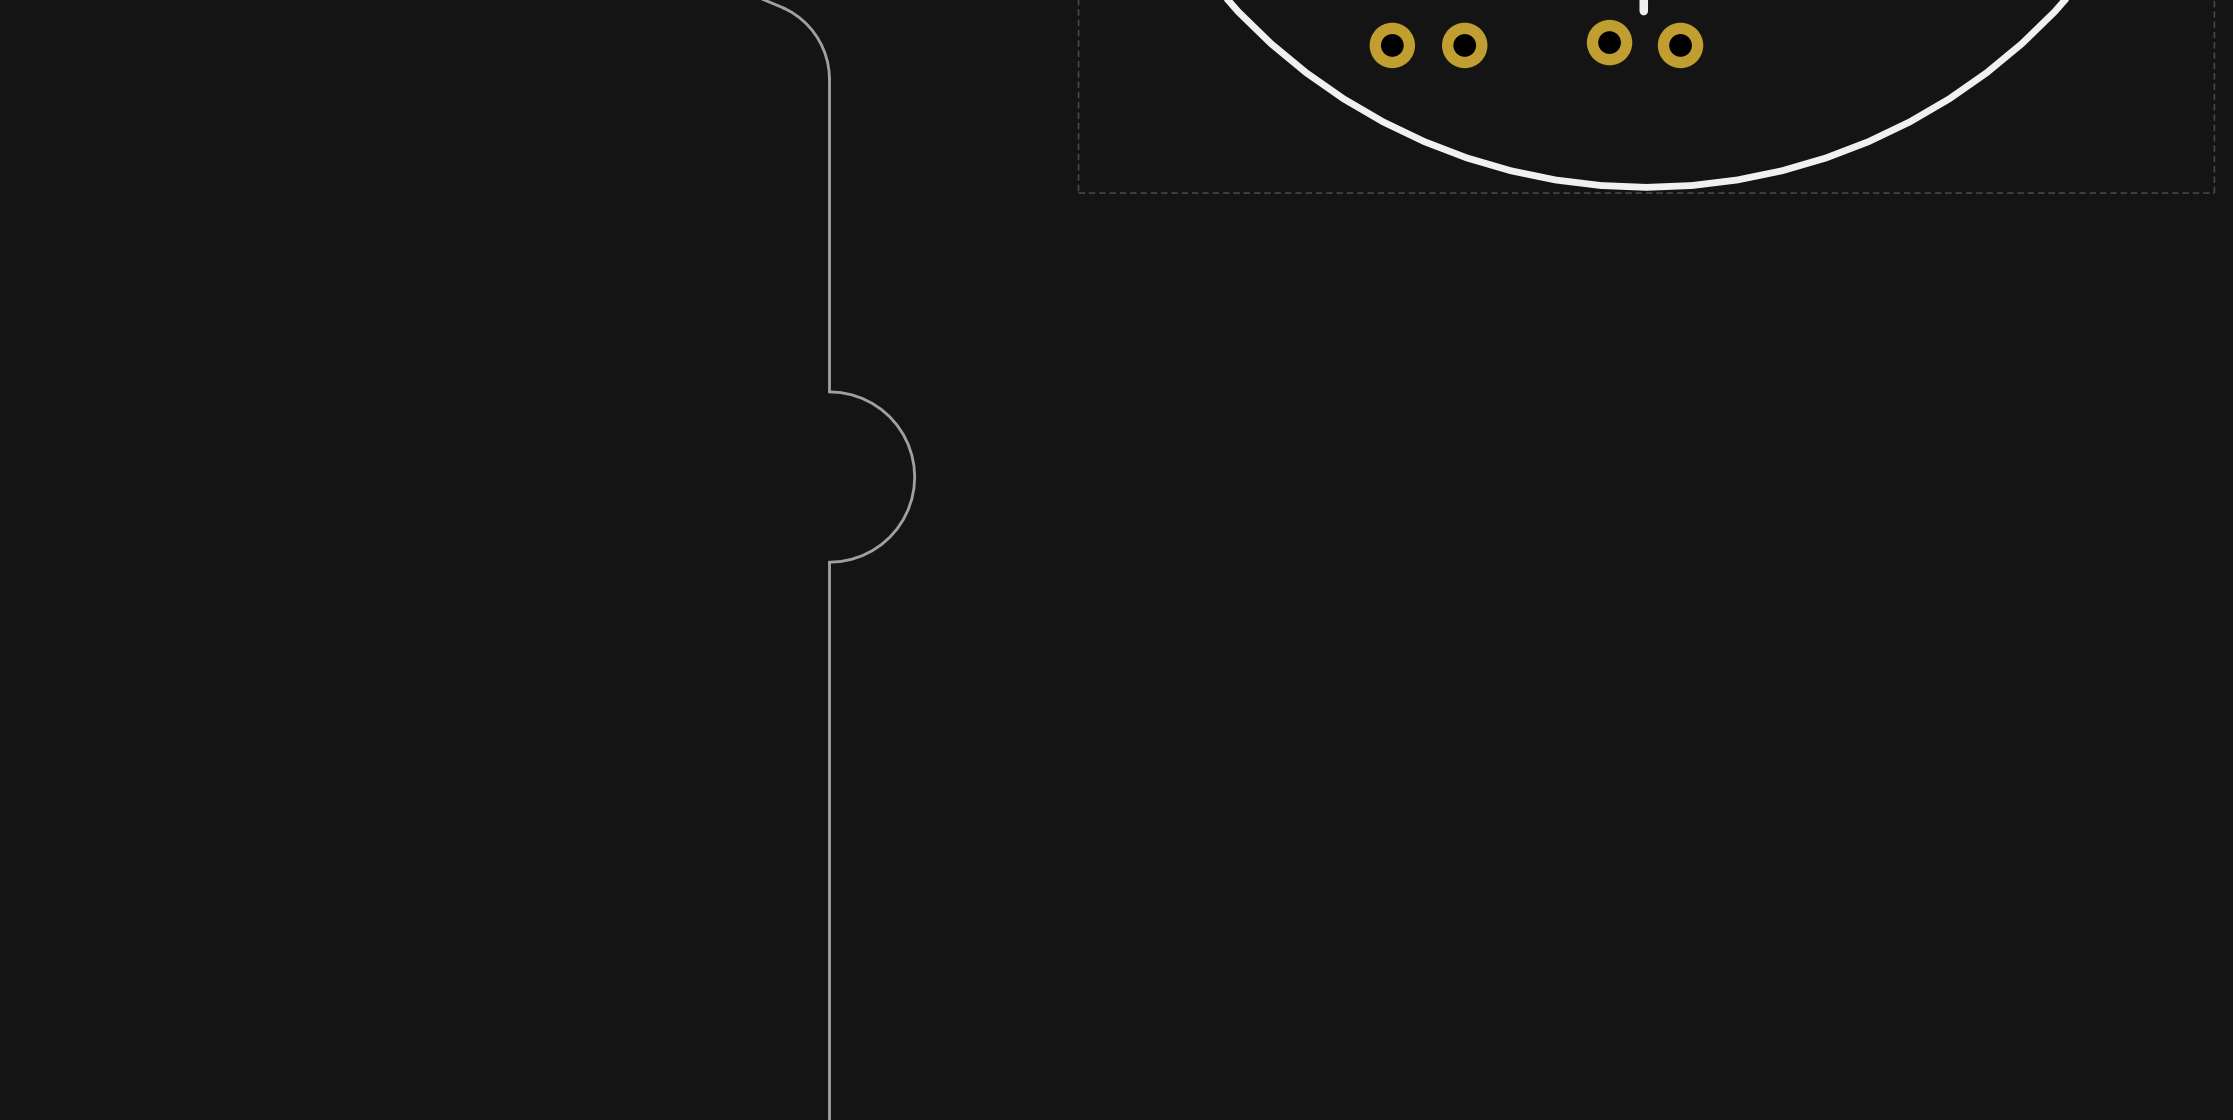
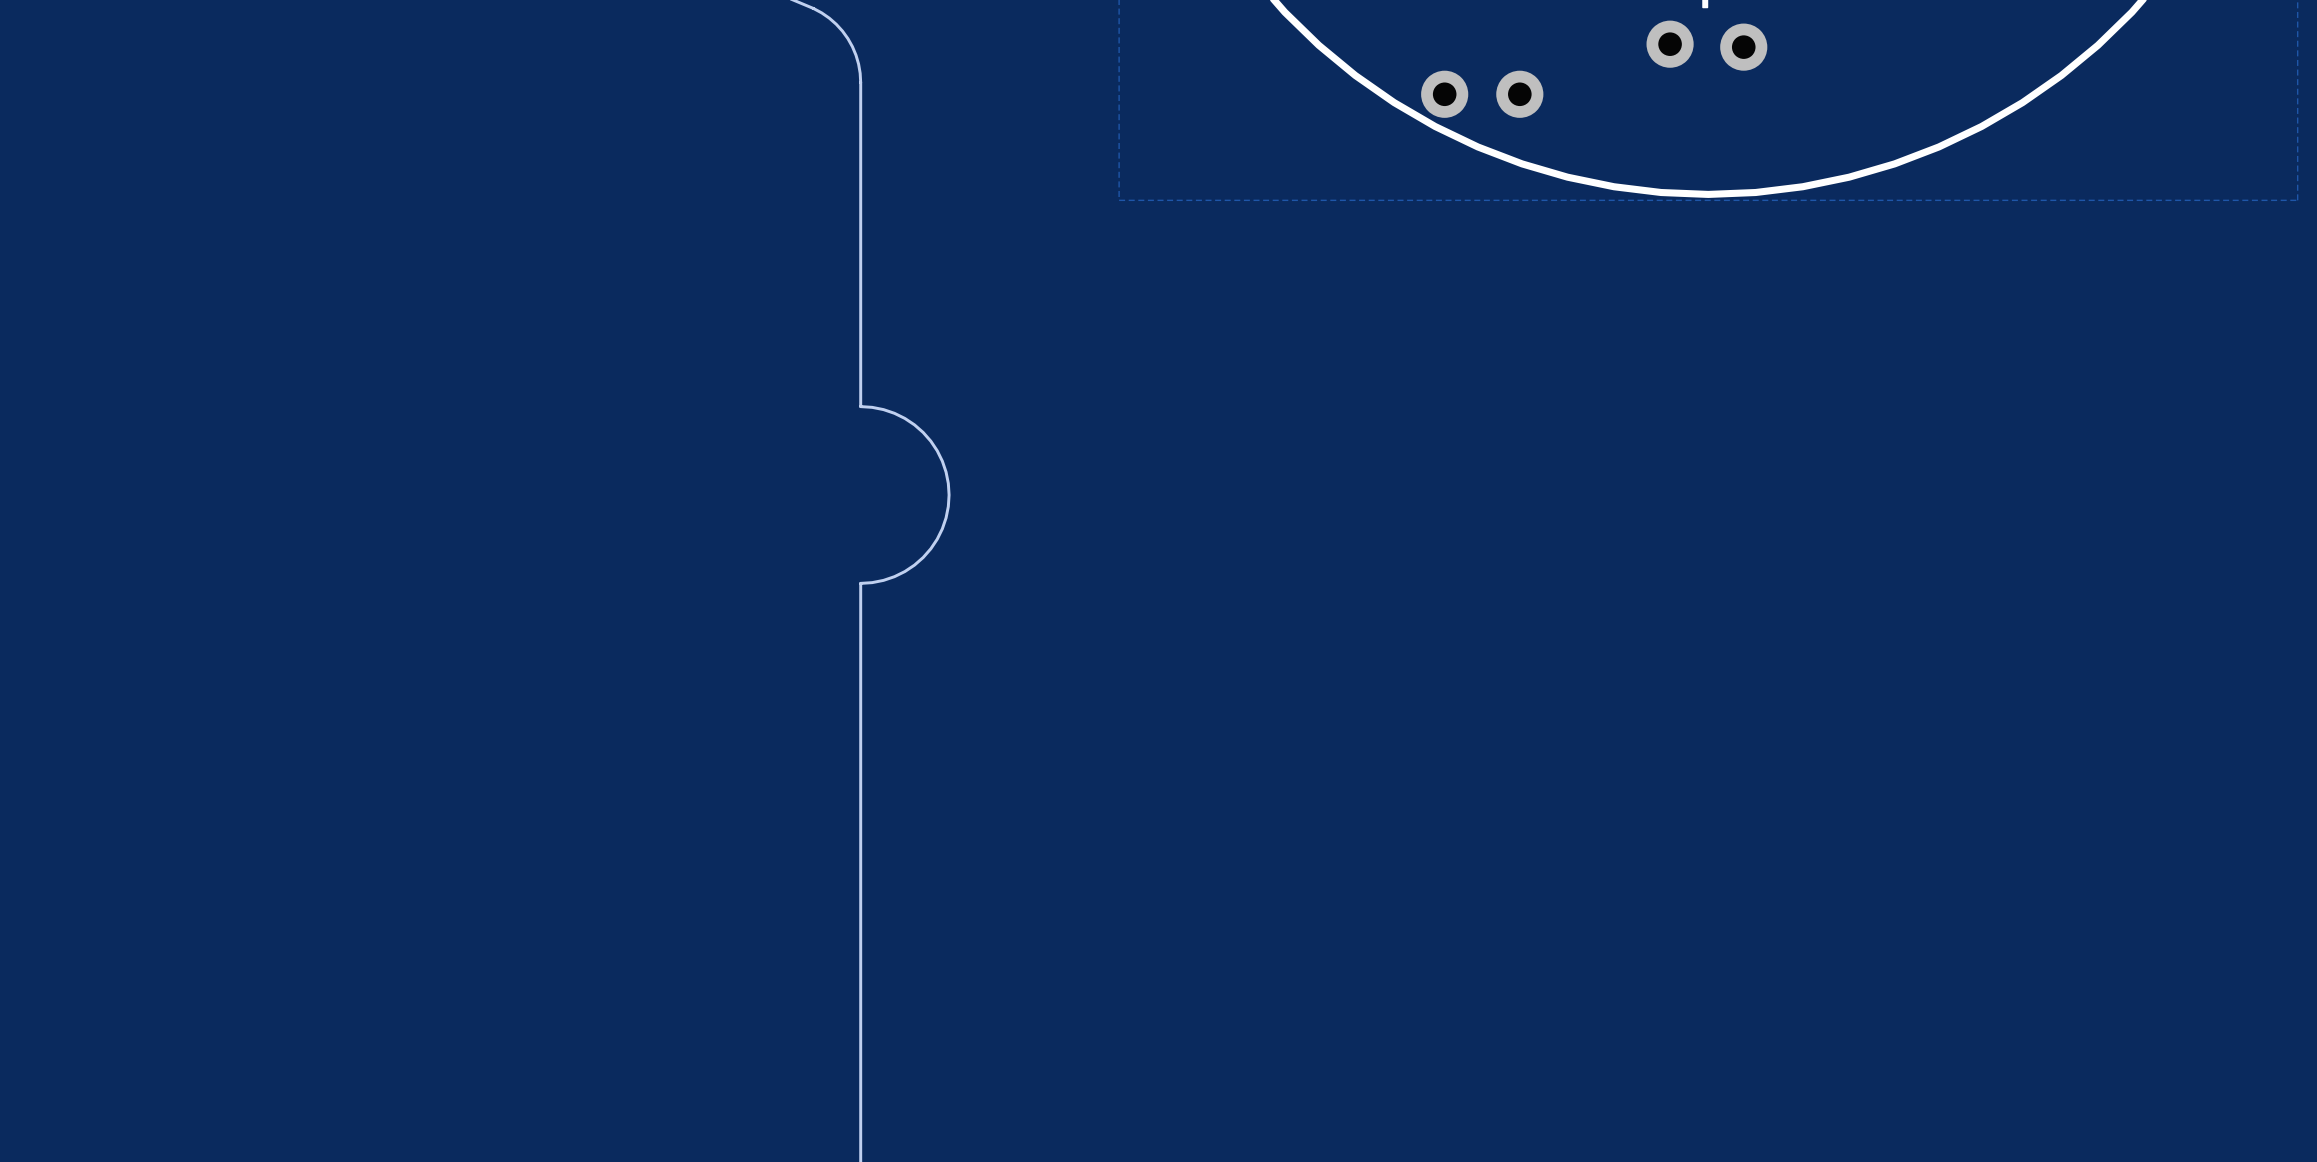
via position: (1392, 45) -> (1444, 94)
via position: (1464, 45) -> (1519, 94)

